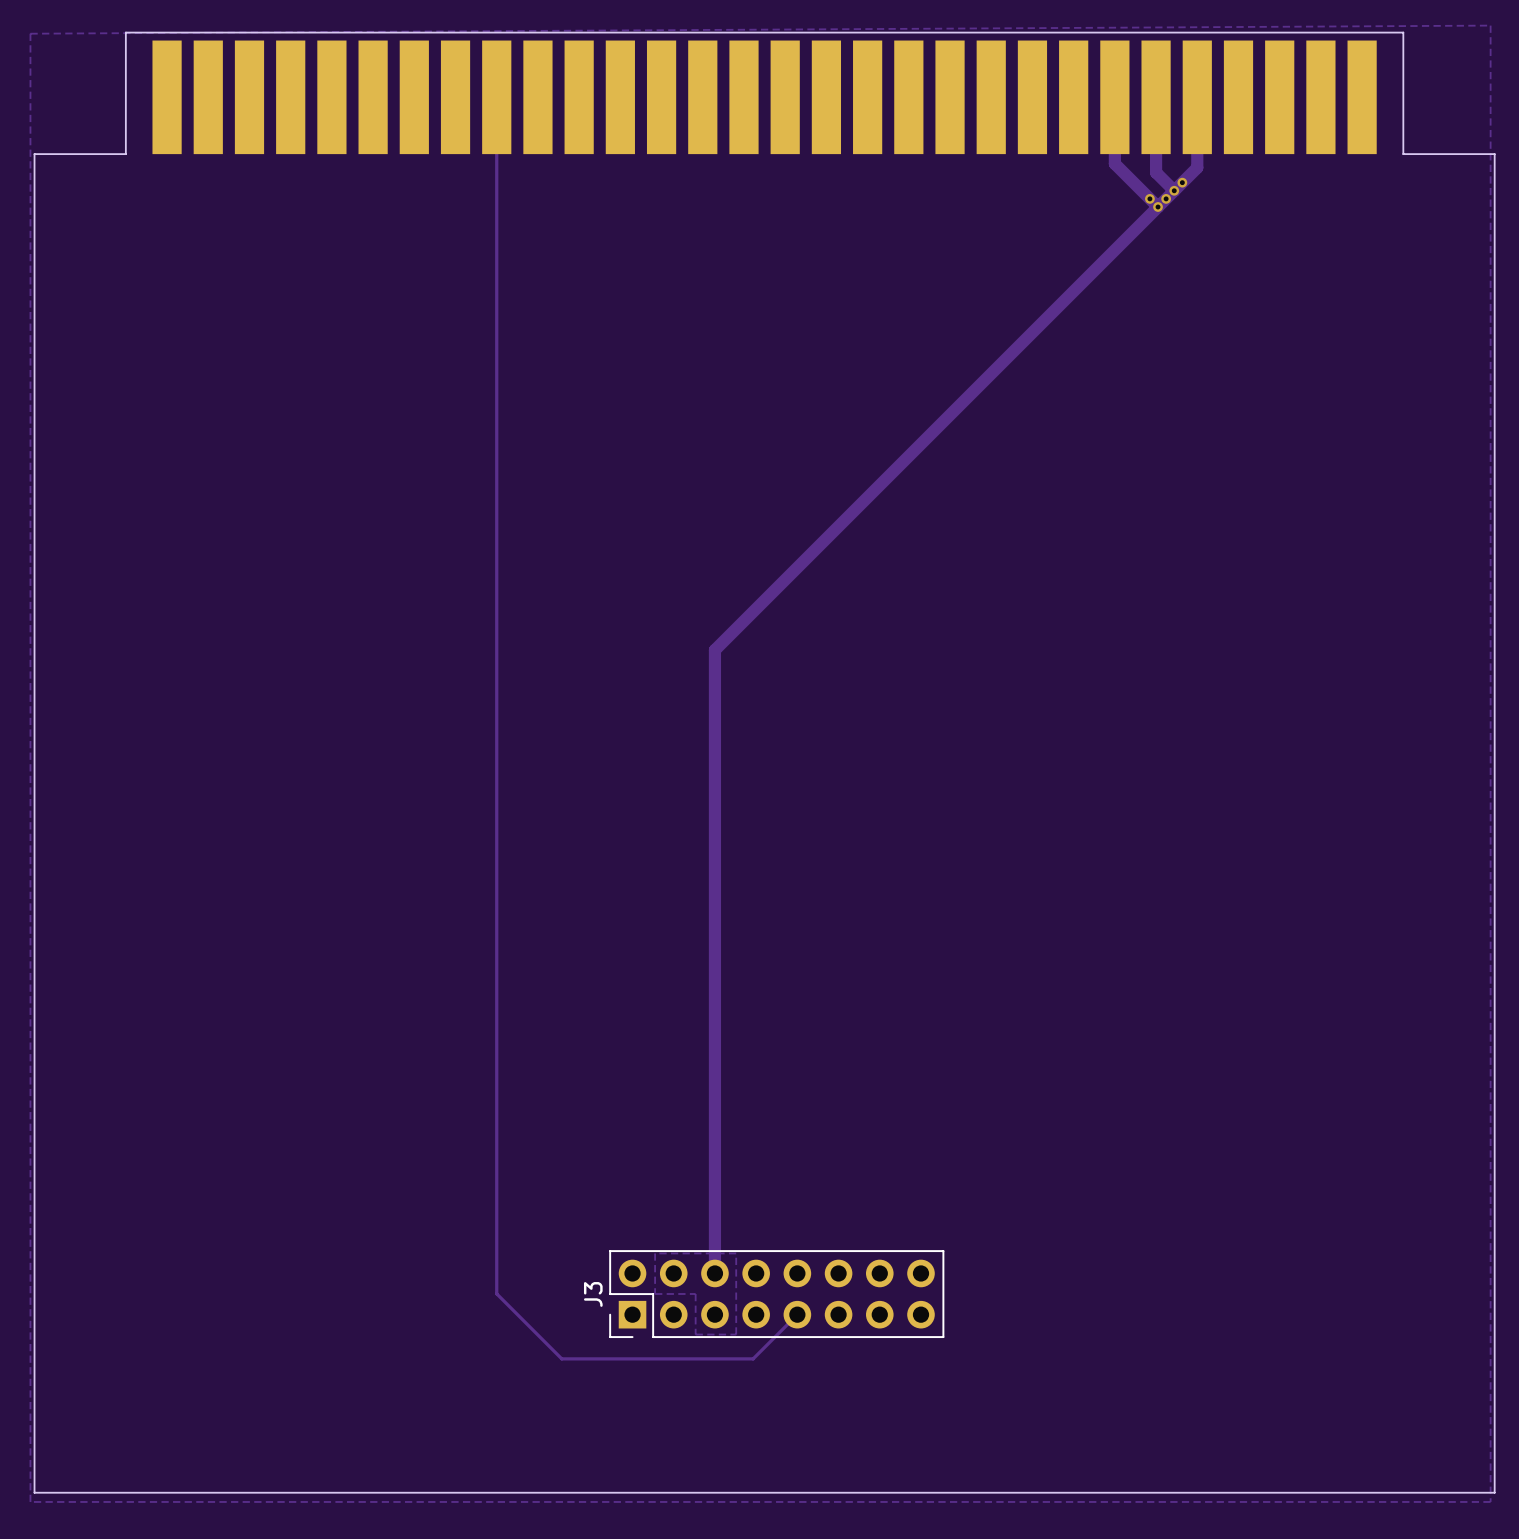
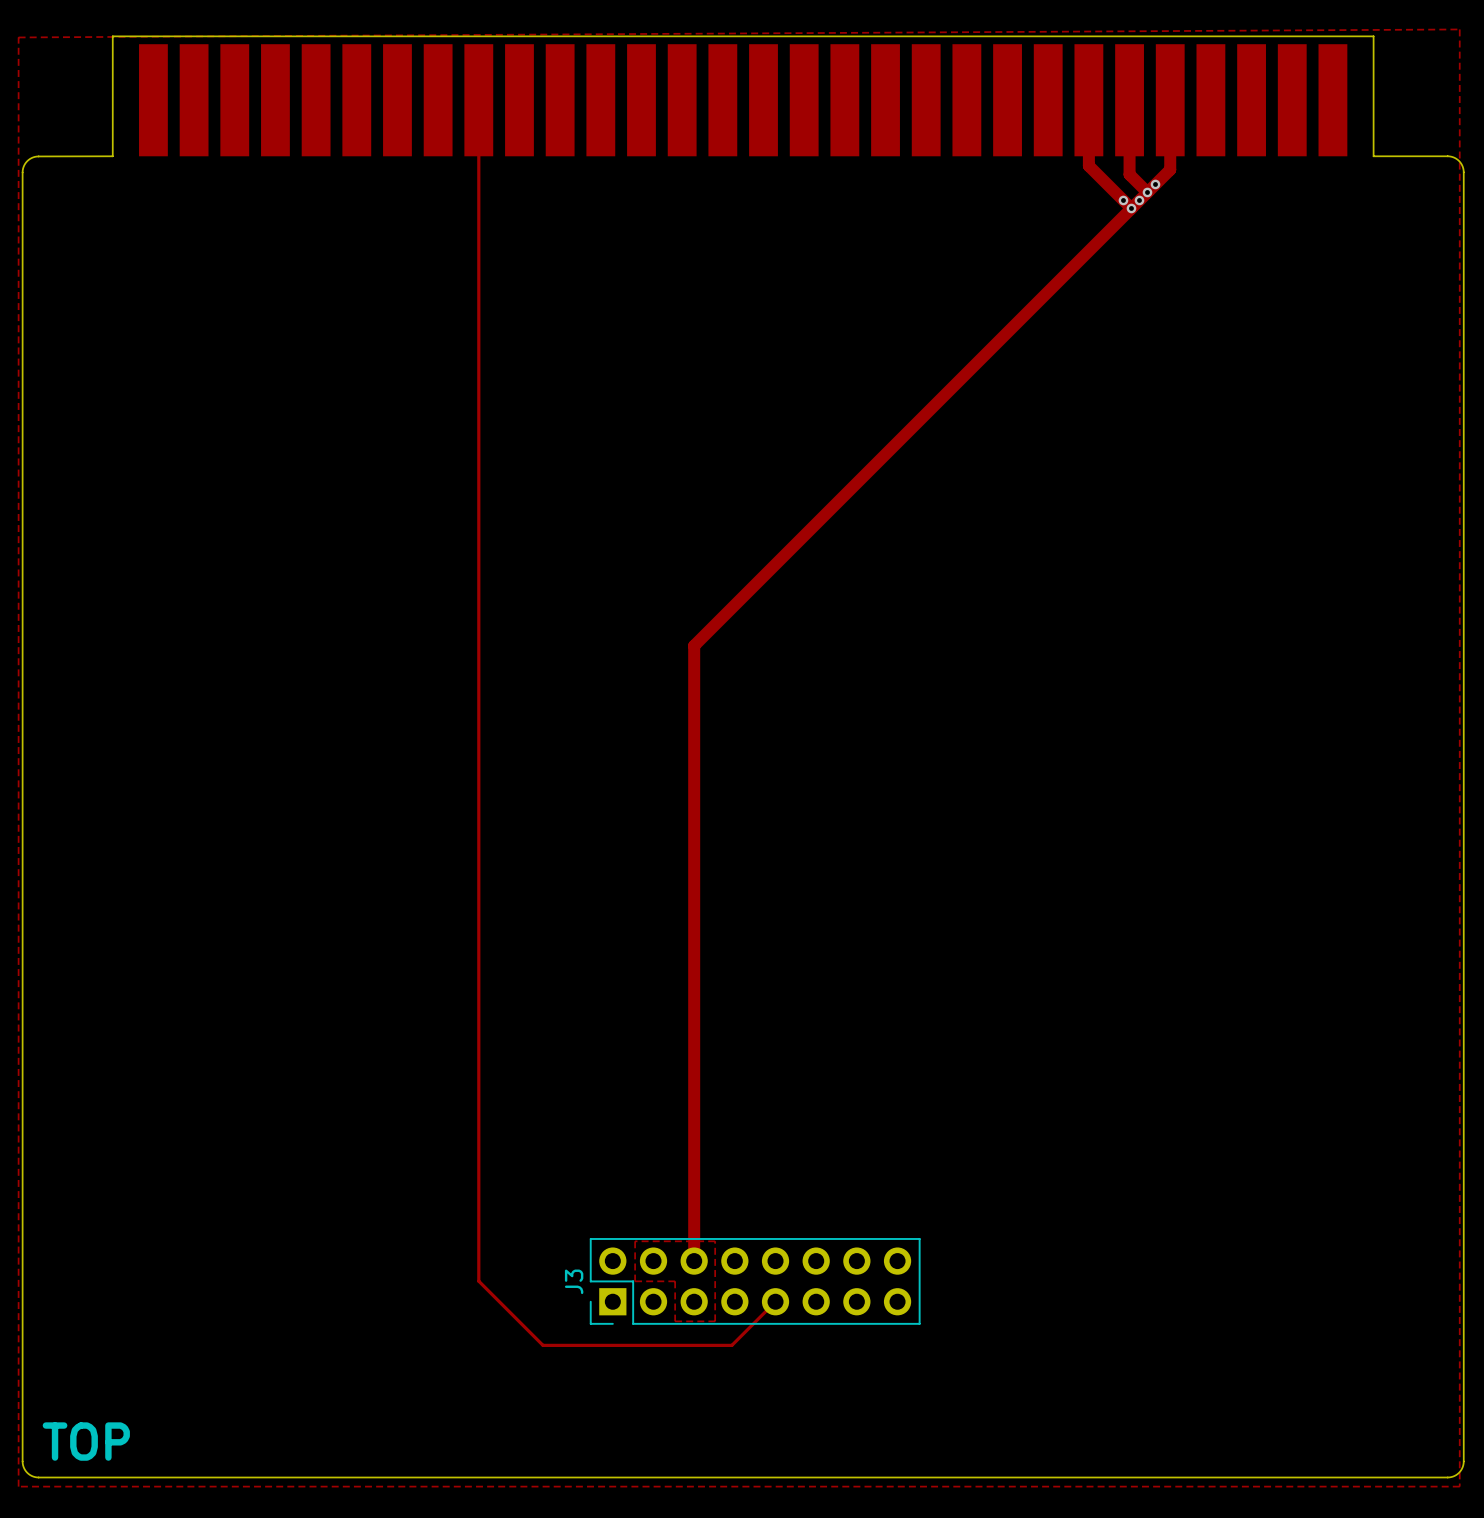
part footprint: [34, 32, 1496, 1494] -> [22, 35, 1465, 1478]

